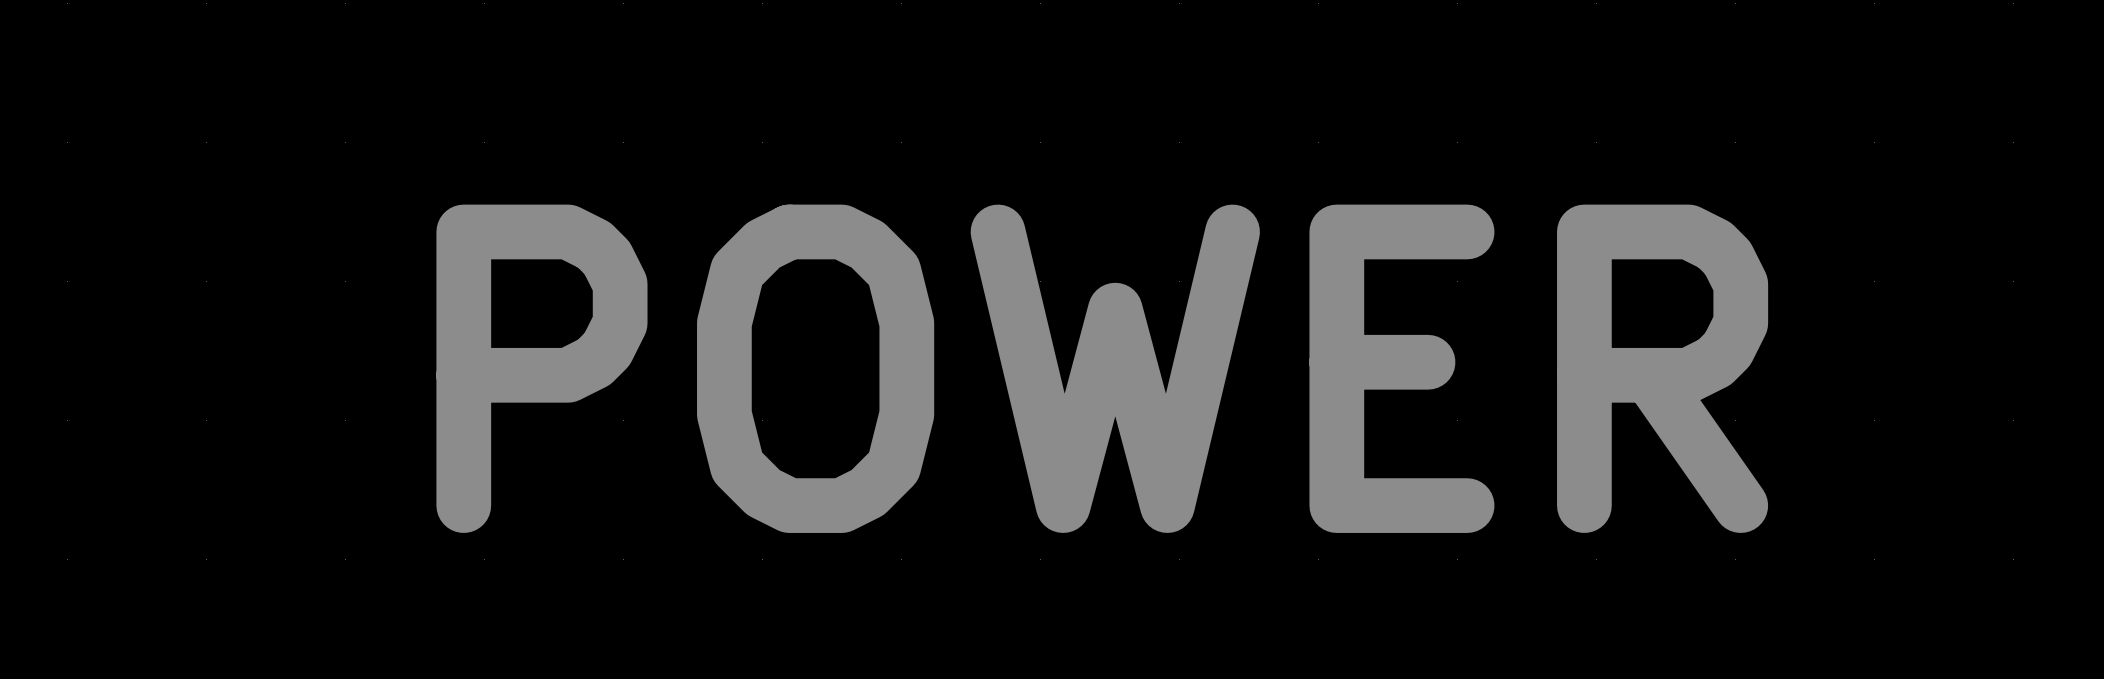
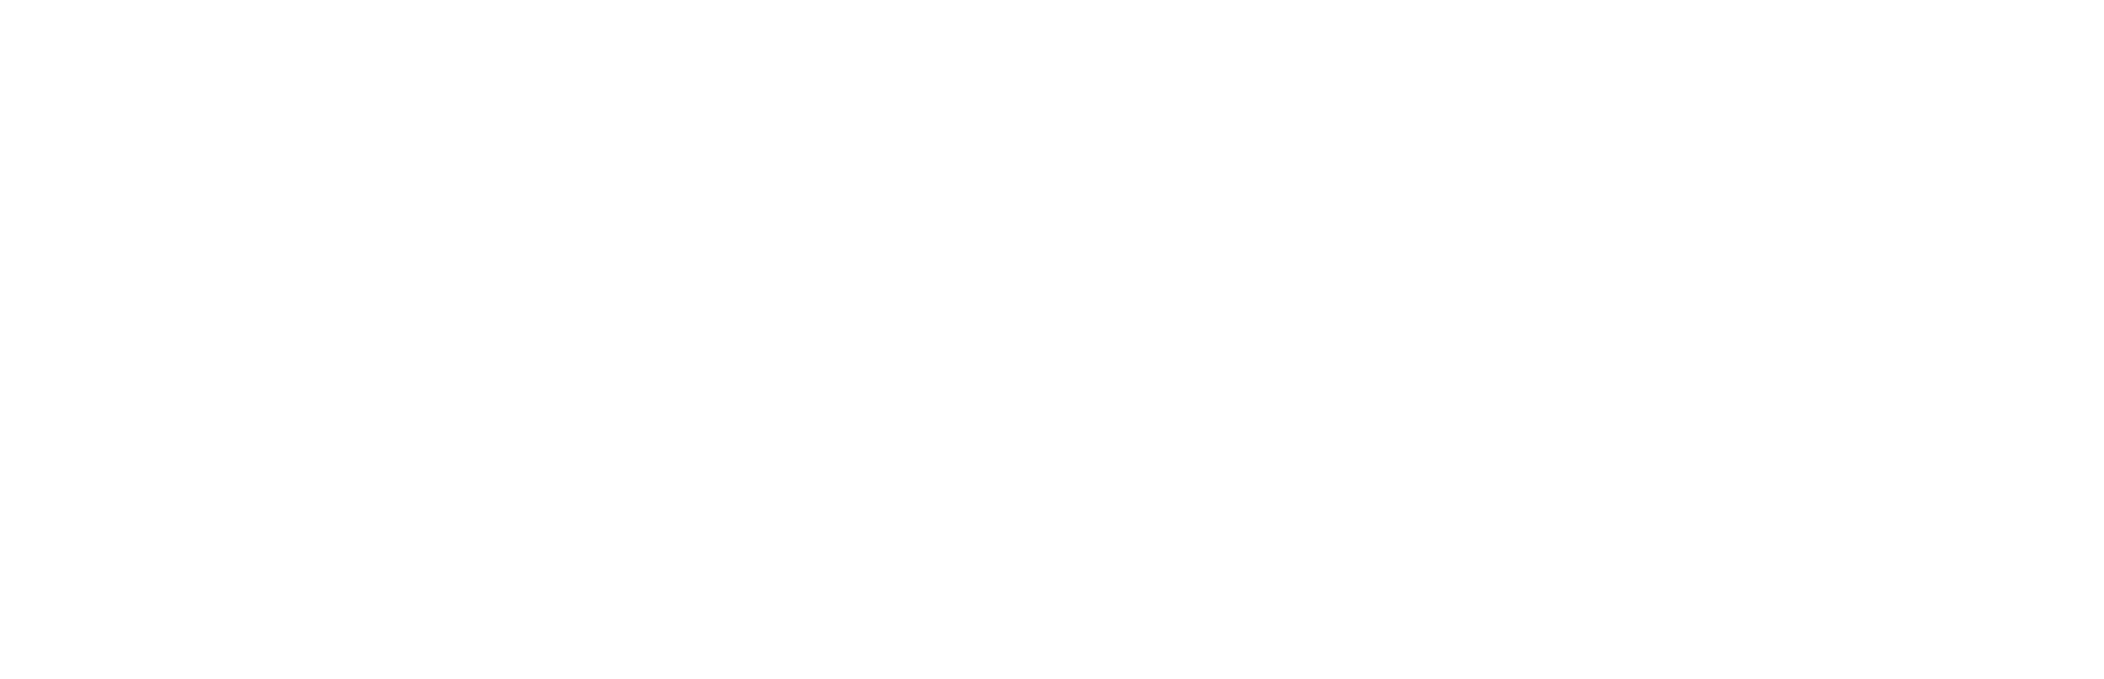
text: POWER (1102, 368) -> none

